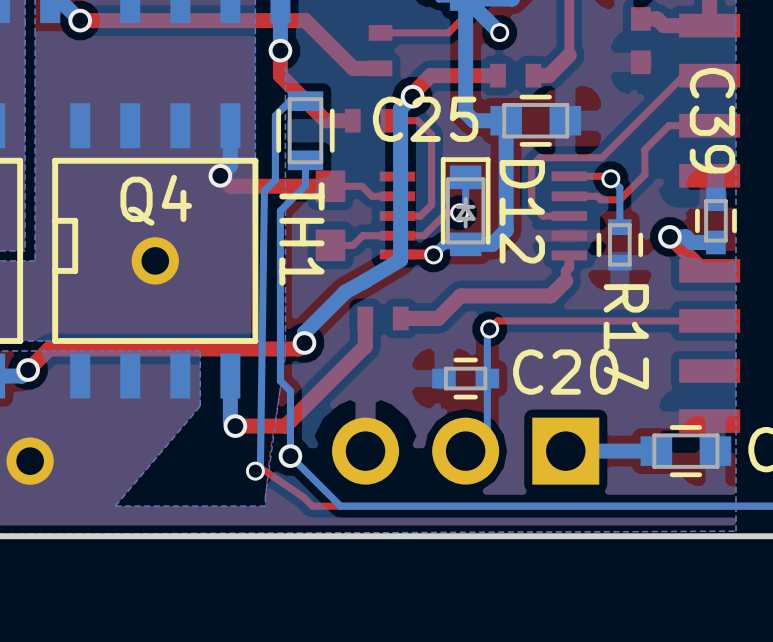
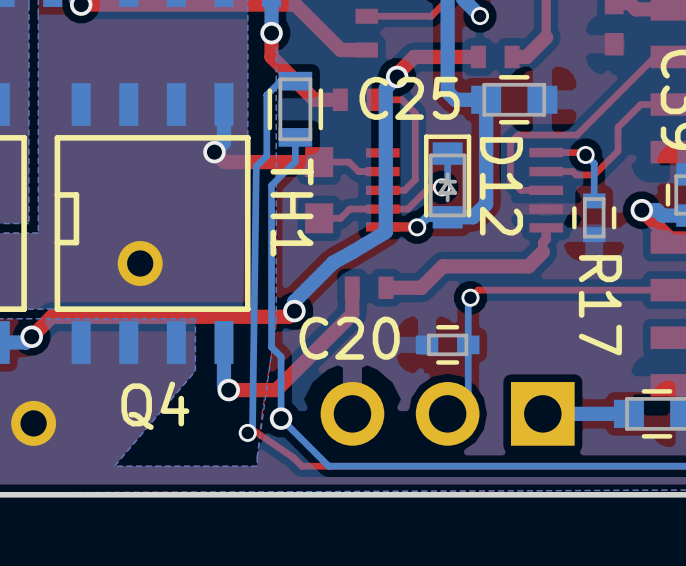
Q4 name position: Q4 (156, 200) -> Q4 (155, 405)
part position: (155, 260) -> (140, 263)
C20 name position: C20 (565, 372) -> C20 (349, 338)

